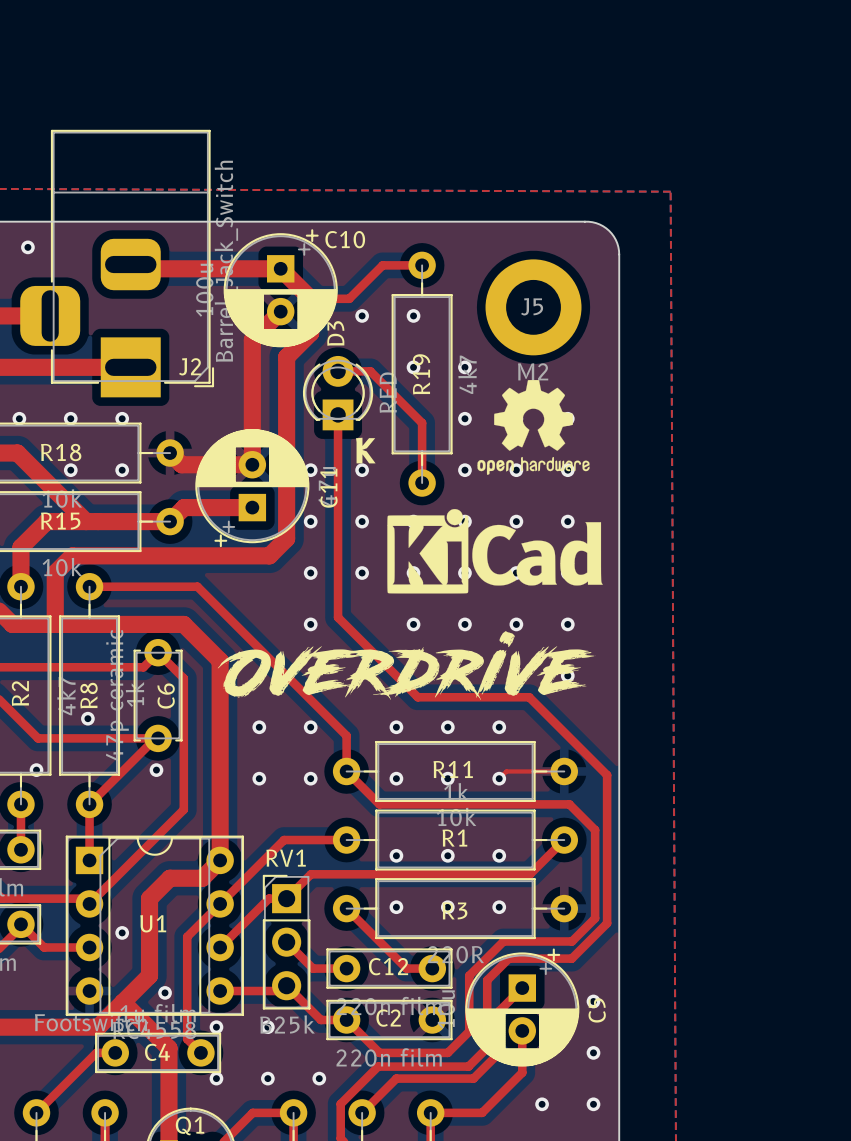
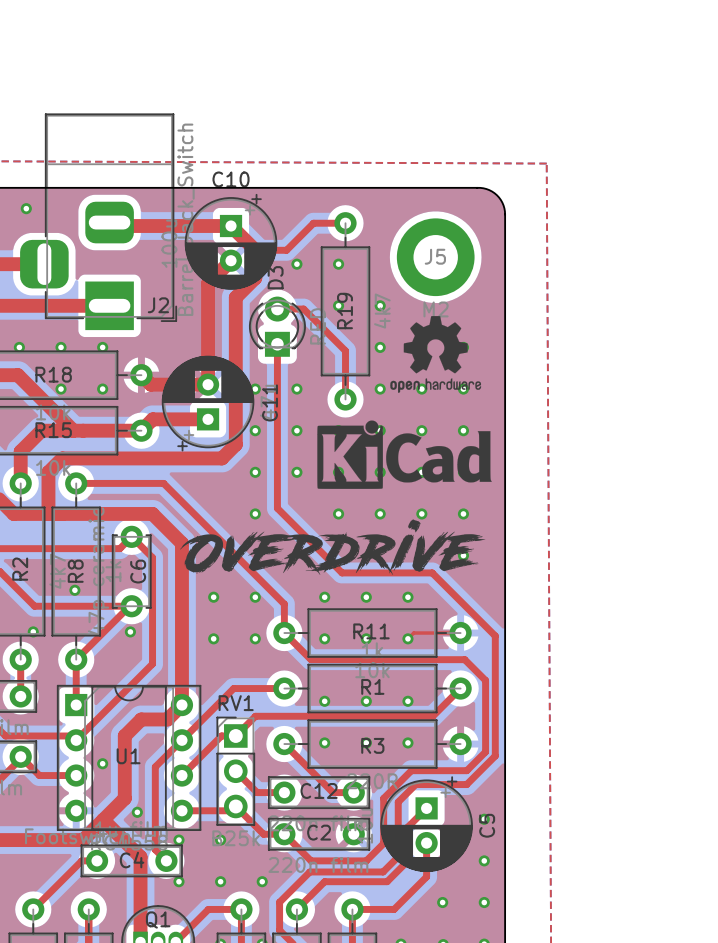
C10 name position: C10 (345, 239) -> C10 (231, 179)
text: K (365, 450) -> none

